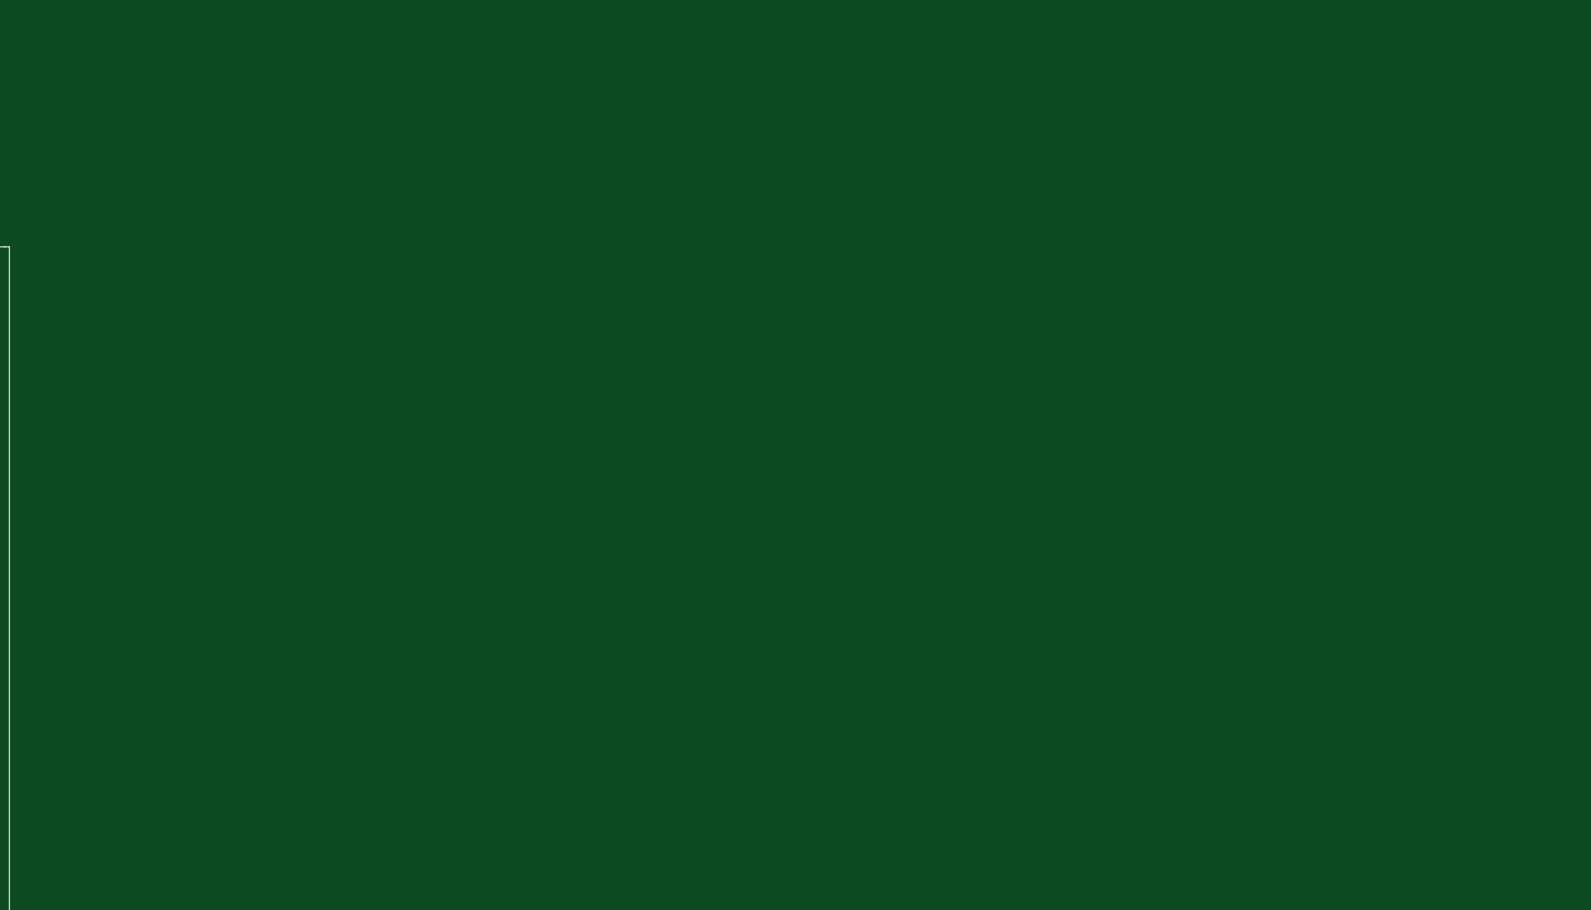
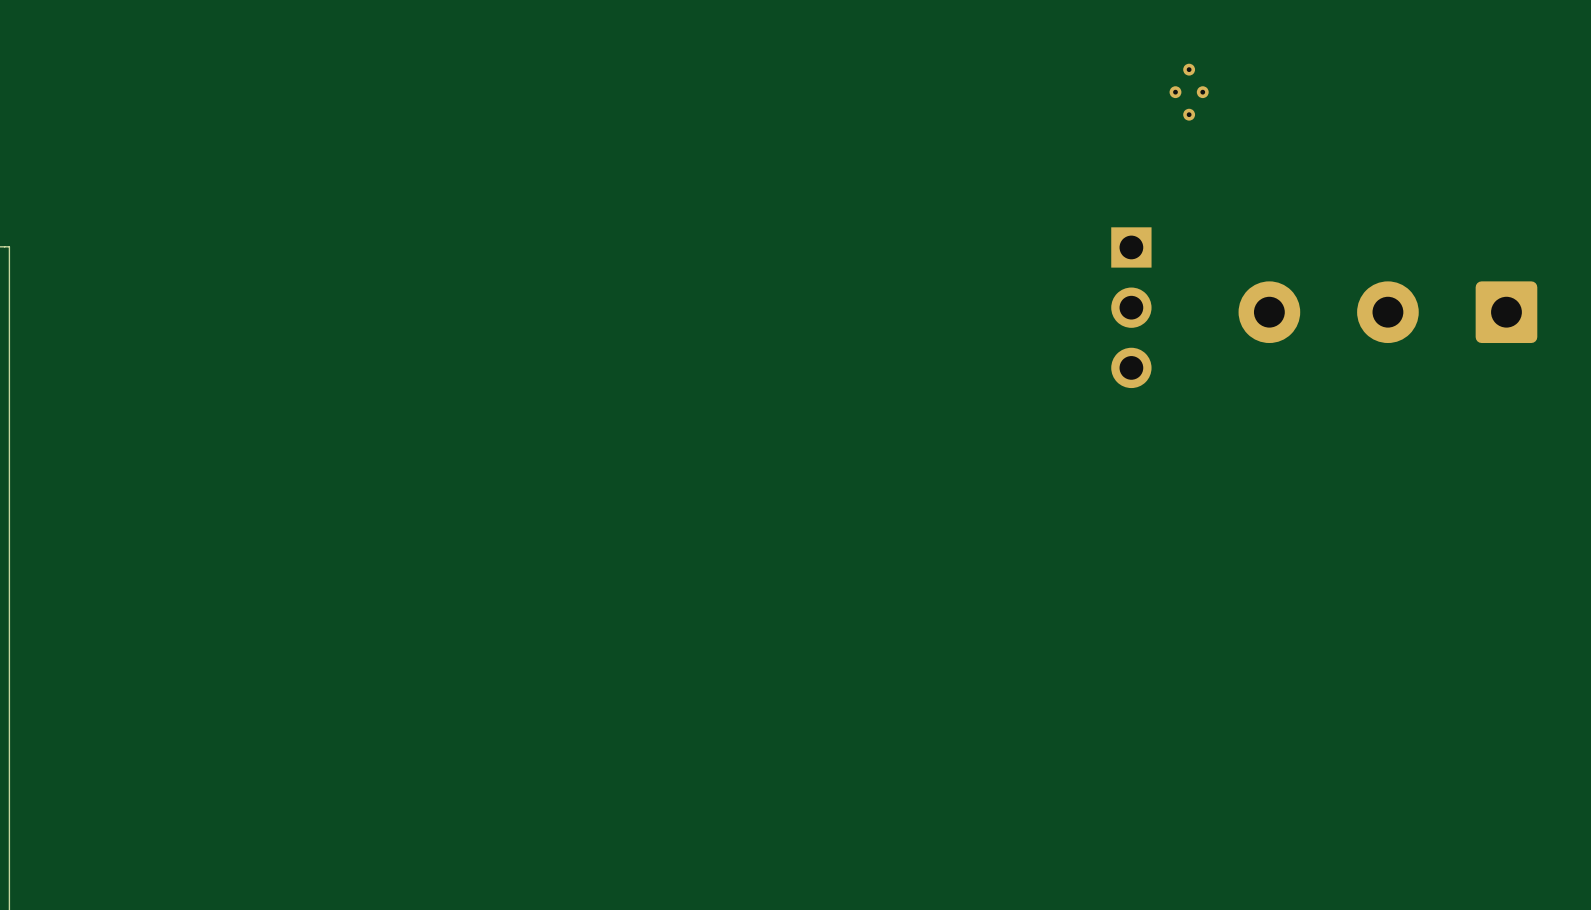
part: none -> (1189, 92)
part: none -> (1131, 307)
part: none -> (1387, 312)

